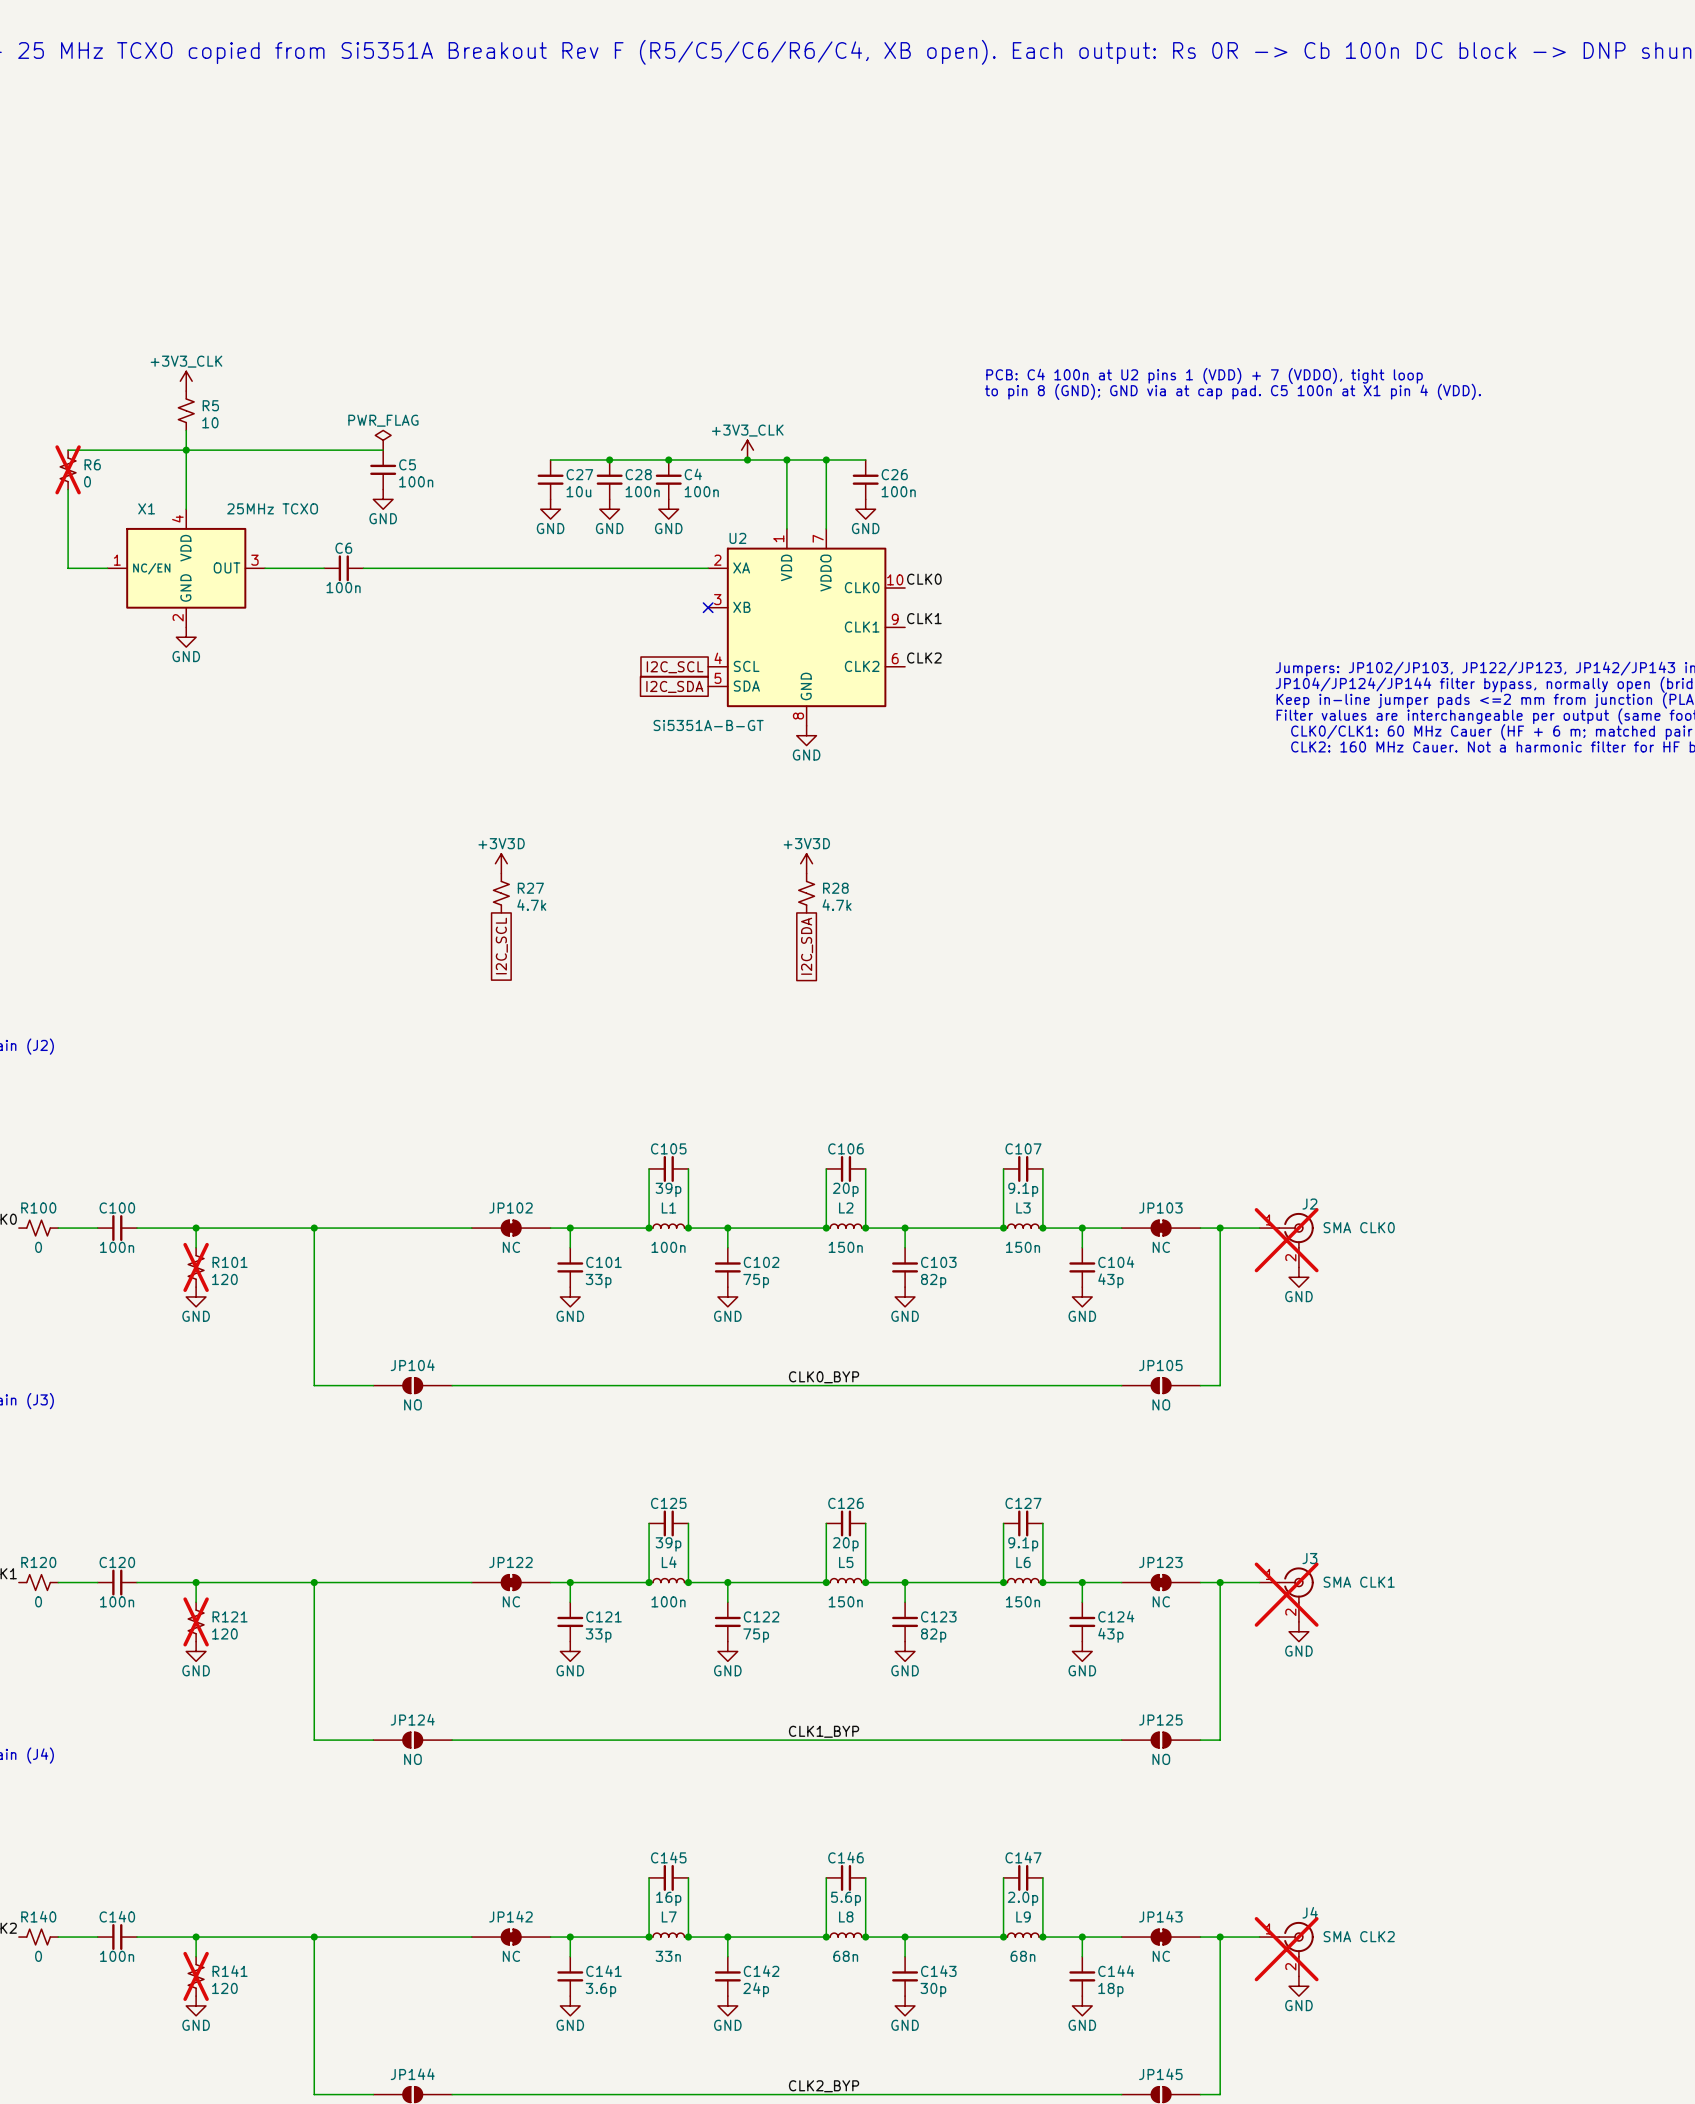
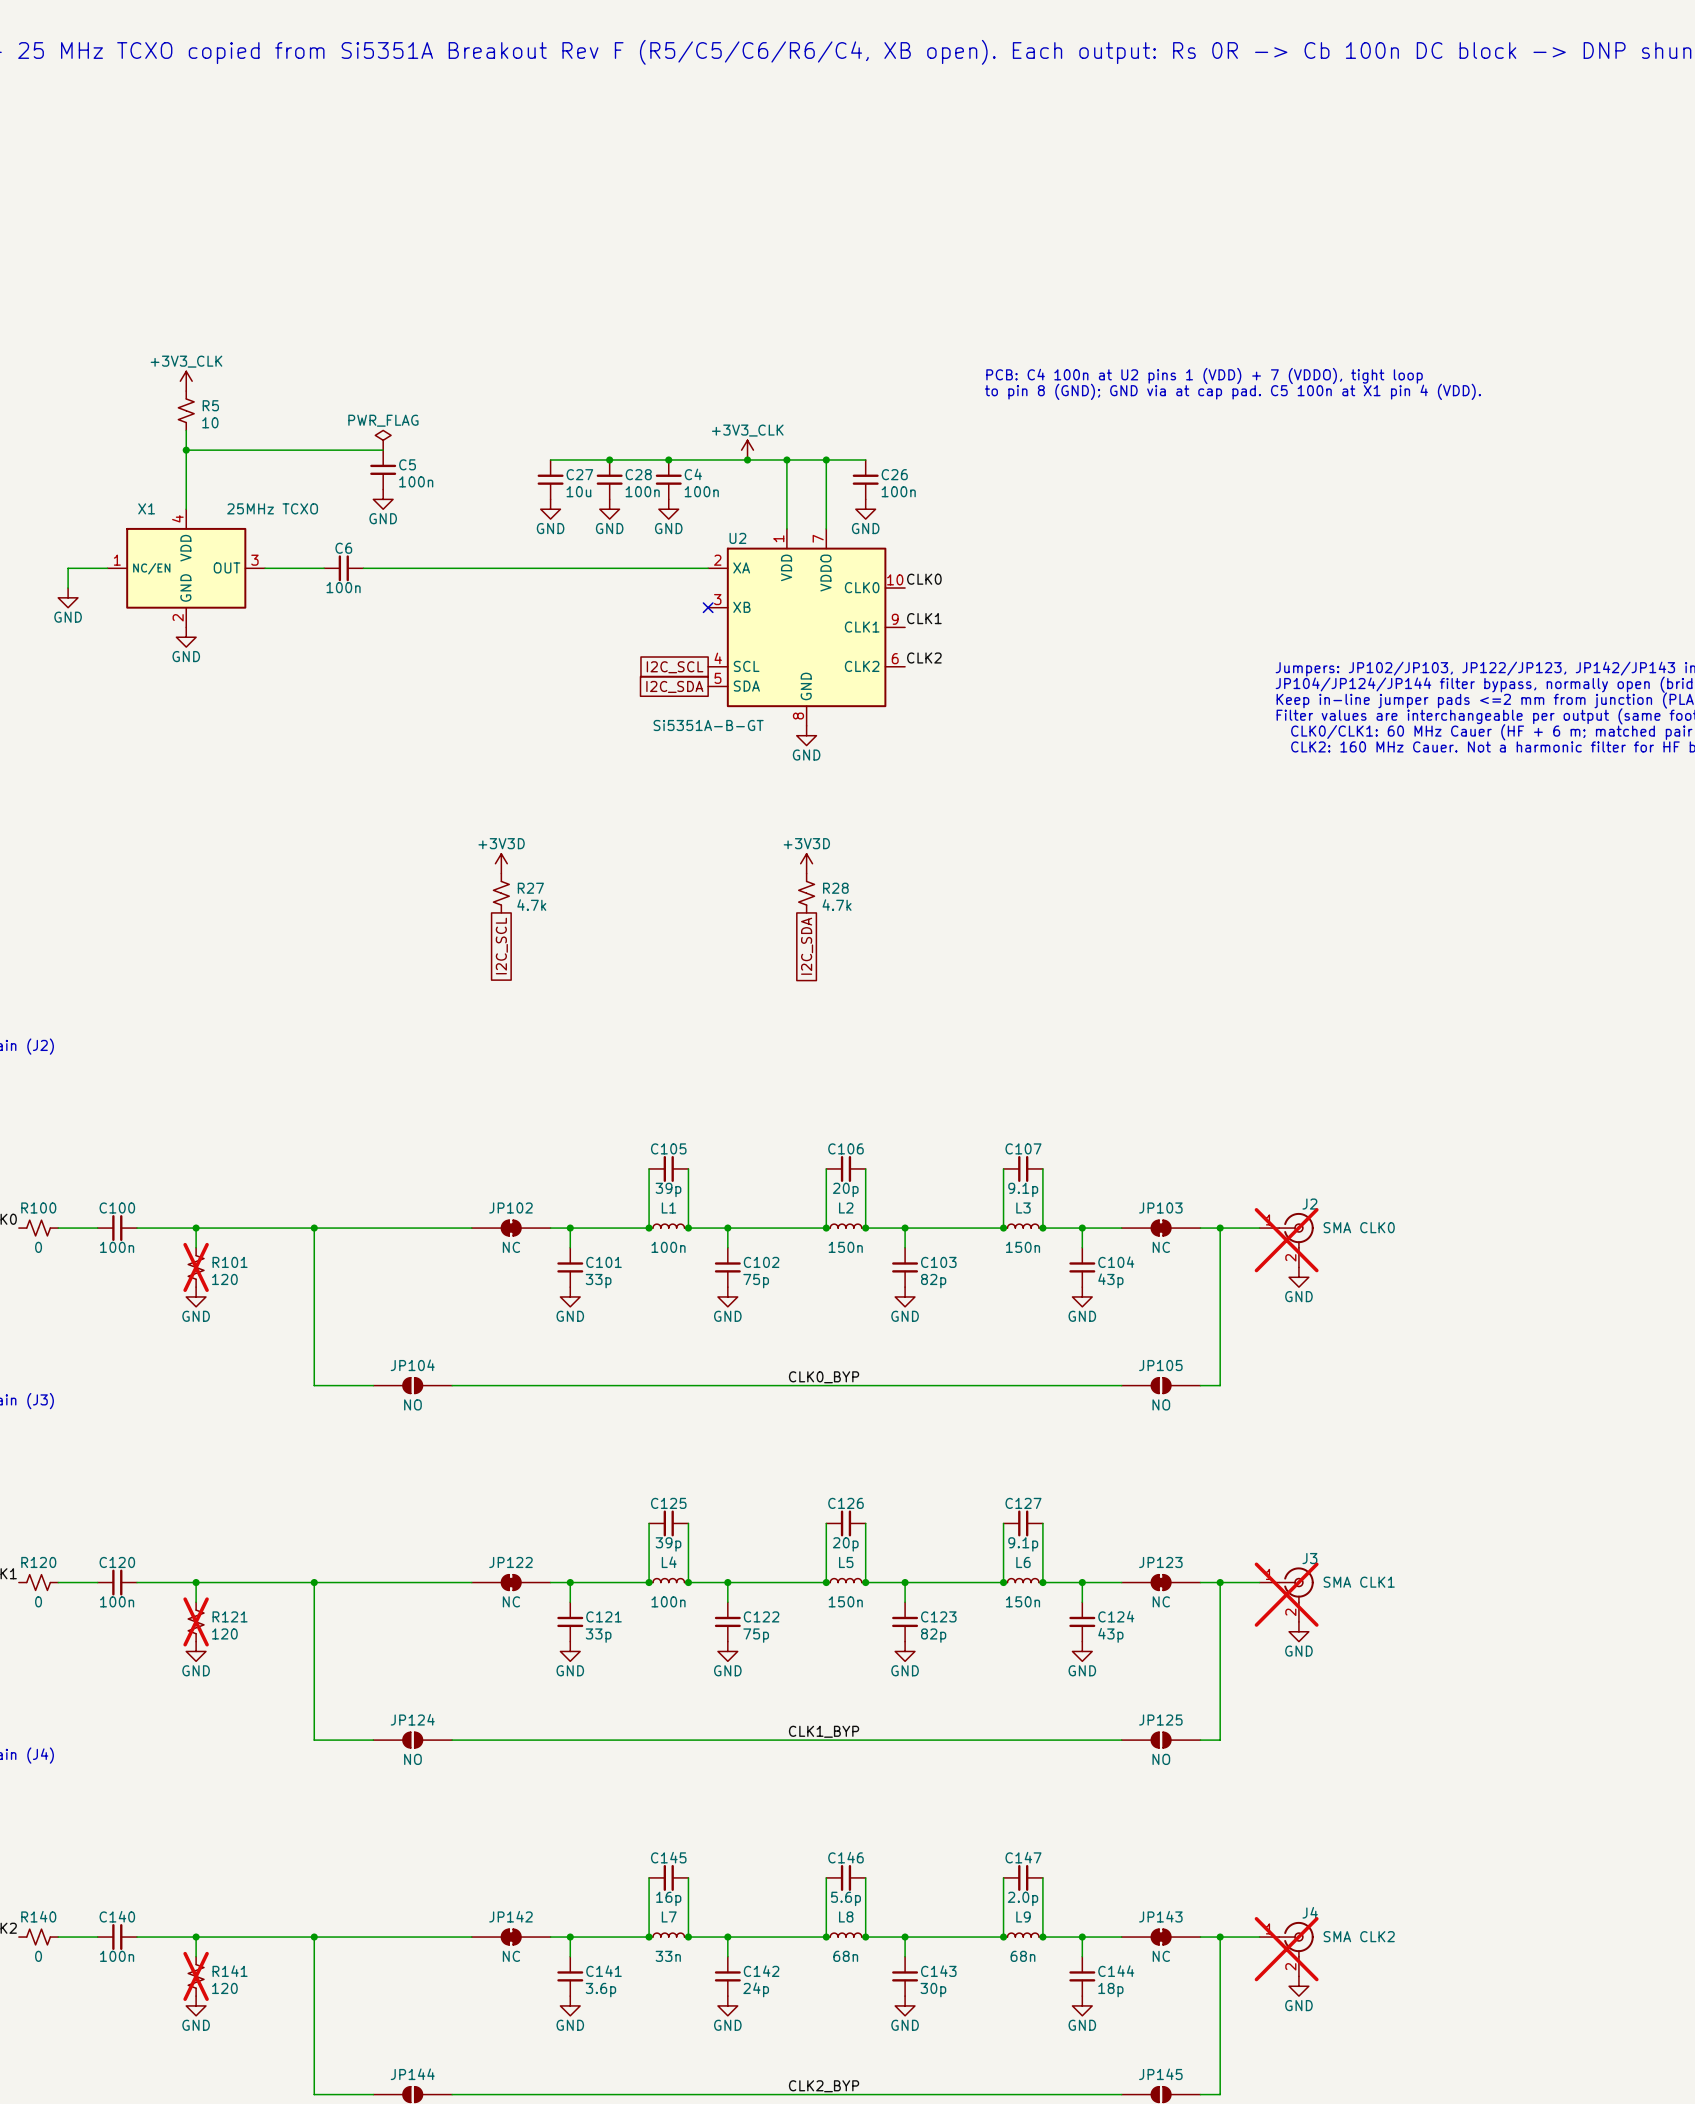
wire: (68, 450) (186, 450) -> none
R6: 0 (68, 469) -> none
wire: (68, 489) (68, 568) -> (68, 588) (68, 568)
power symbol: none -> GND (68, 597)

